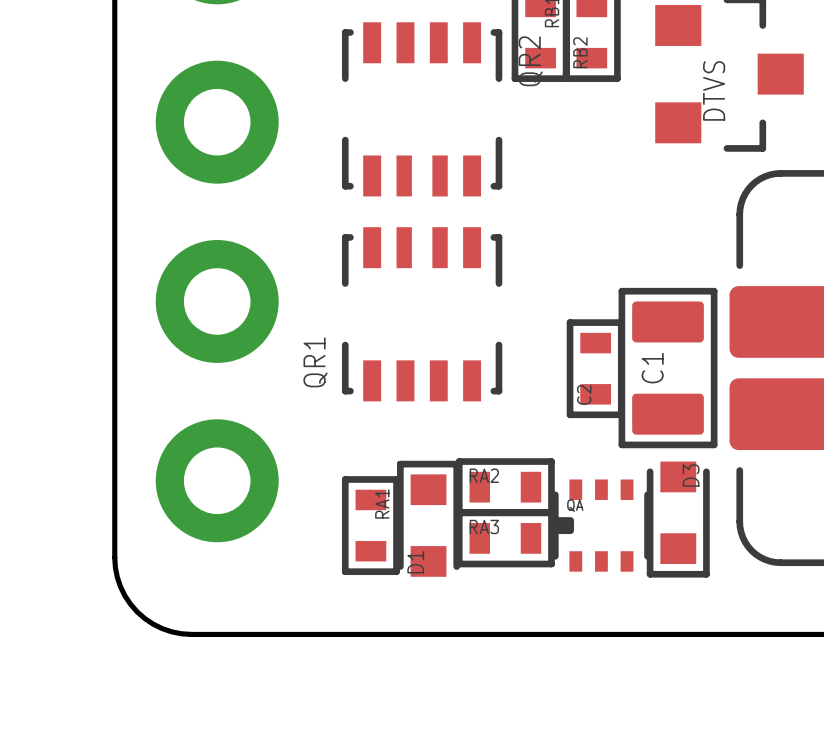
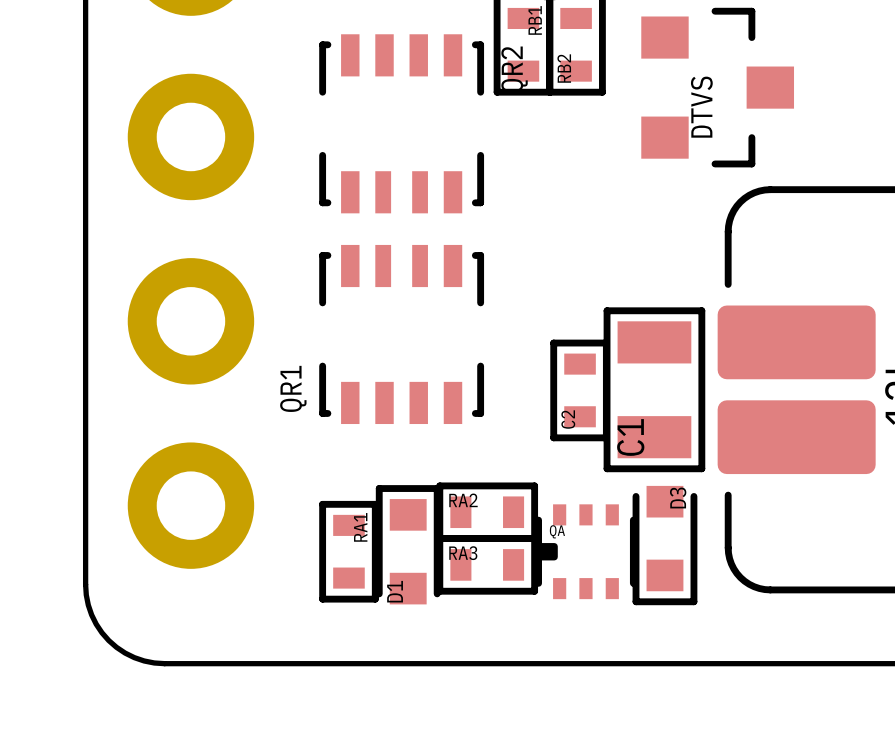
C1 footprint: [618, 287, 718, 449] -> [603, 307, 706, 473]
C1 name position: C1 (652, 368) -> C1 (630, 437)

